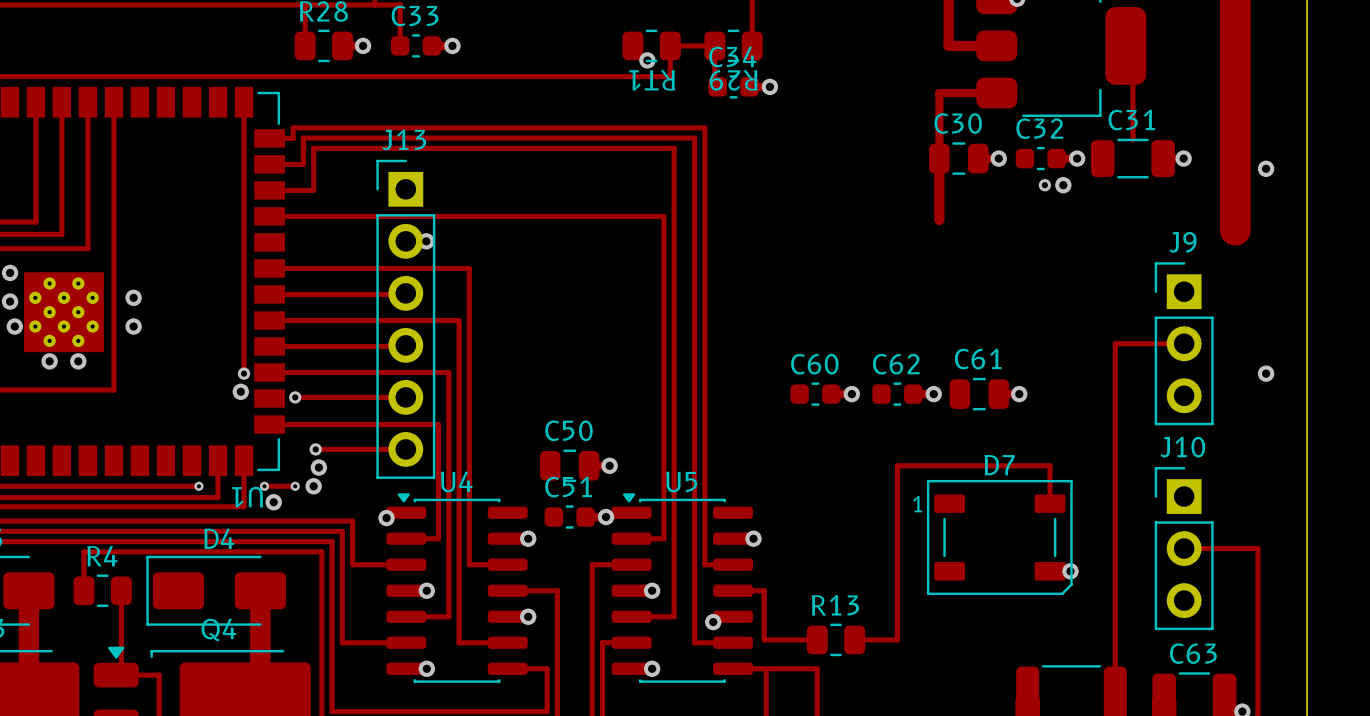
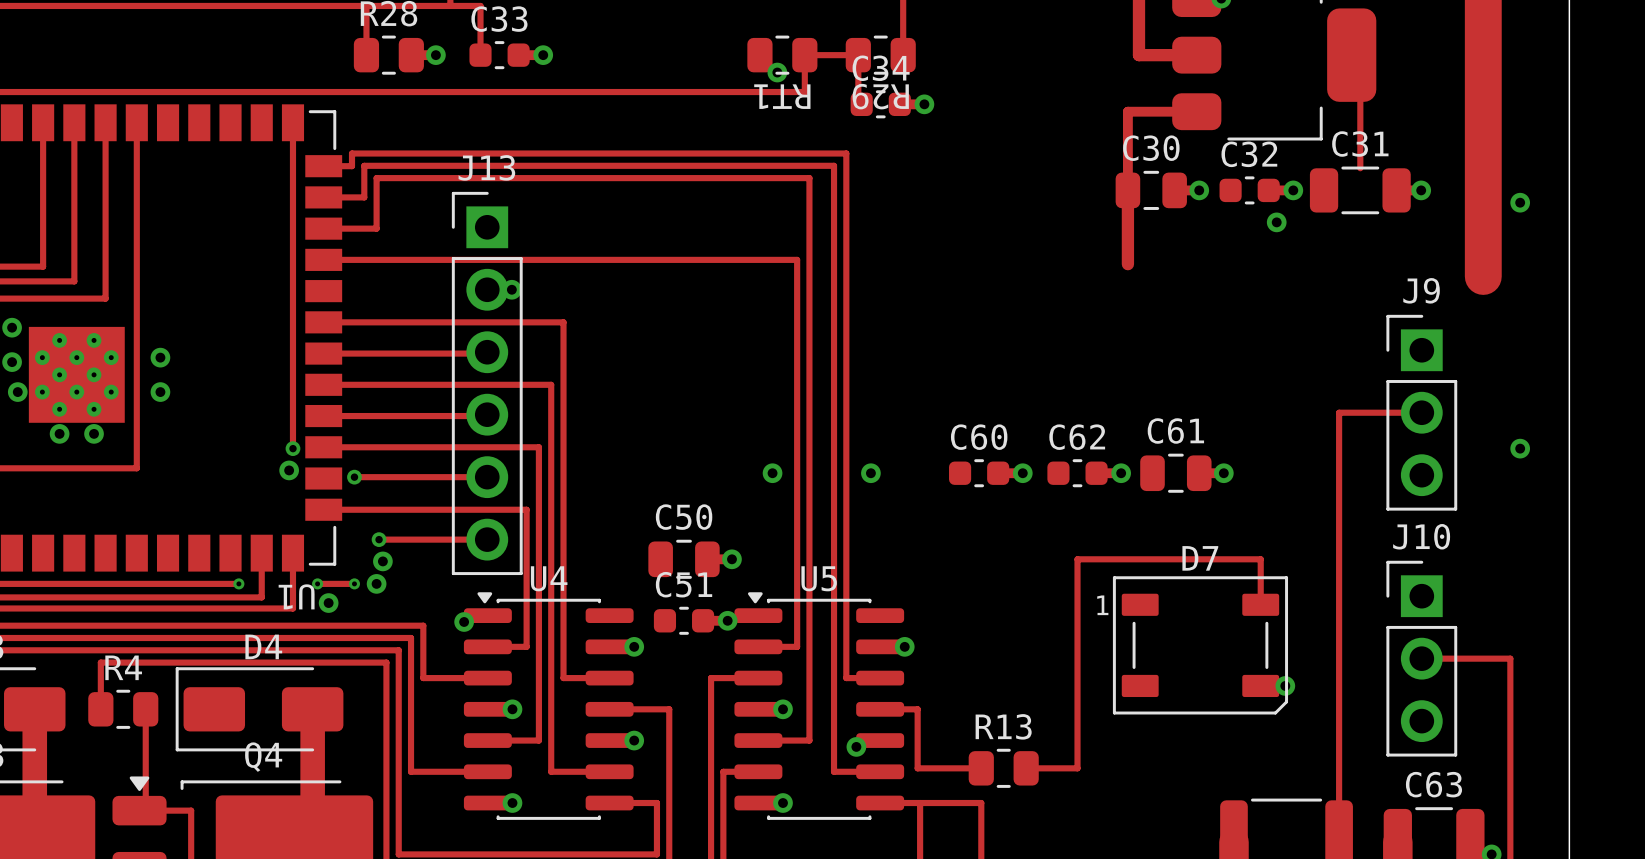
via: (1044, 185) -> none
via: none -> (772, 473)
via: none -> (870, 473)

